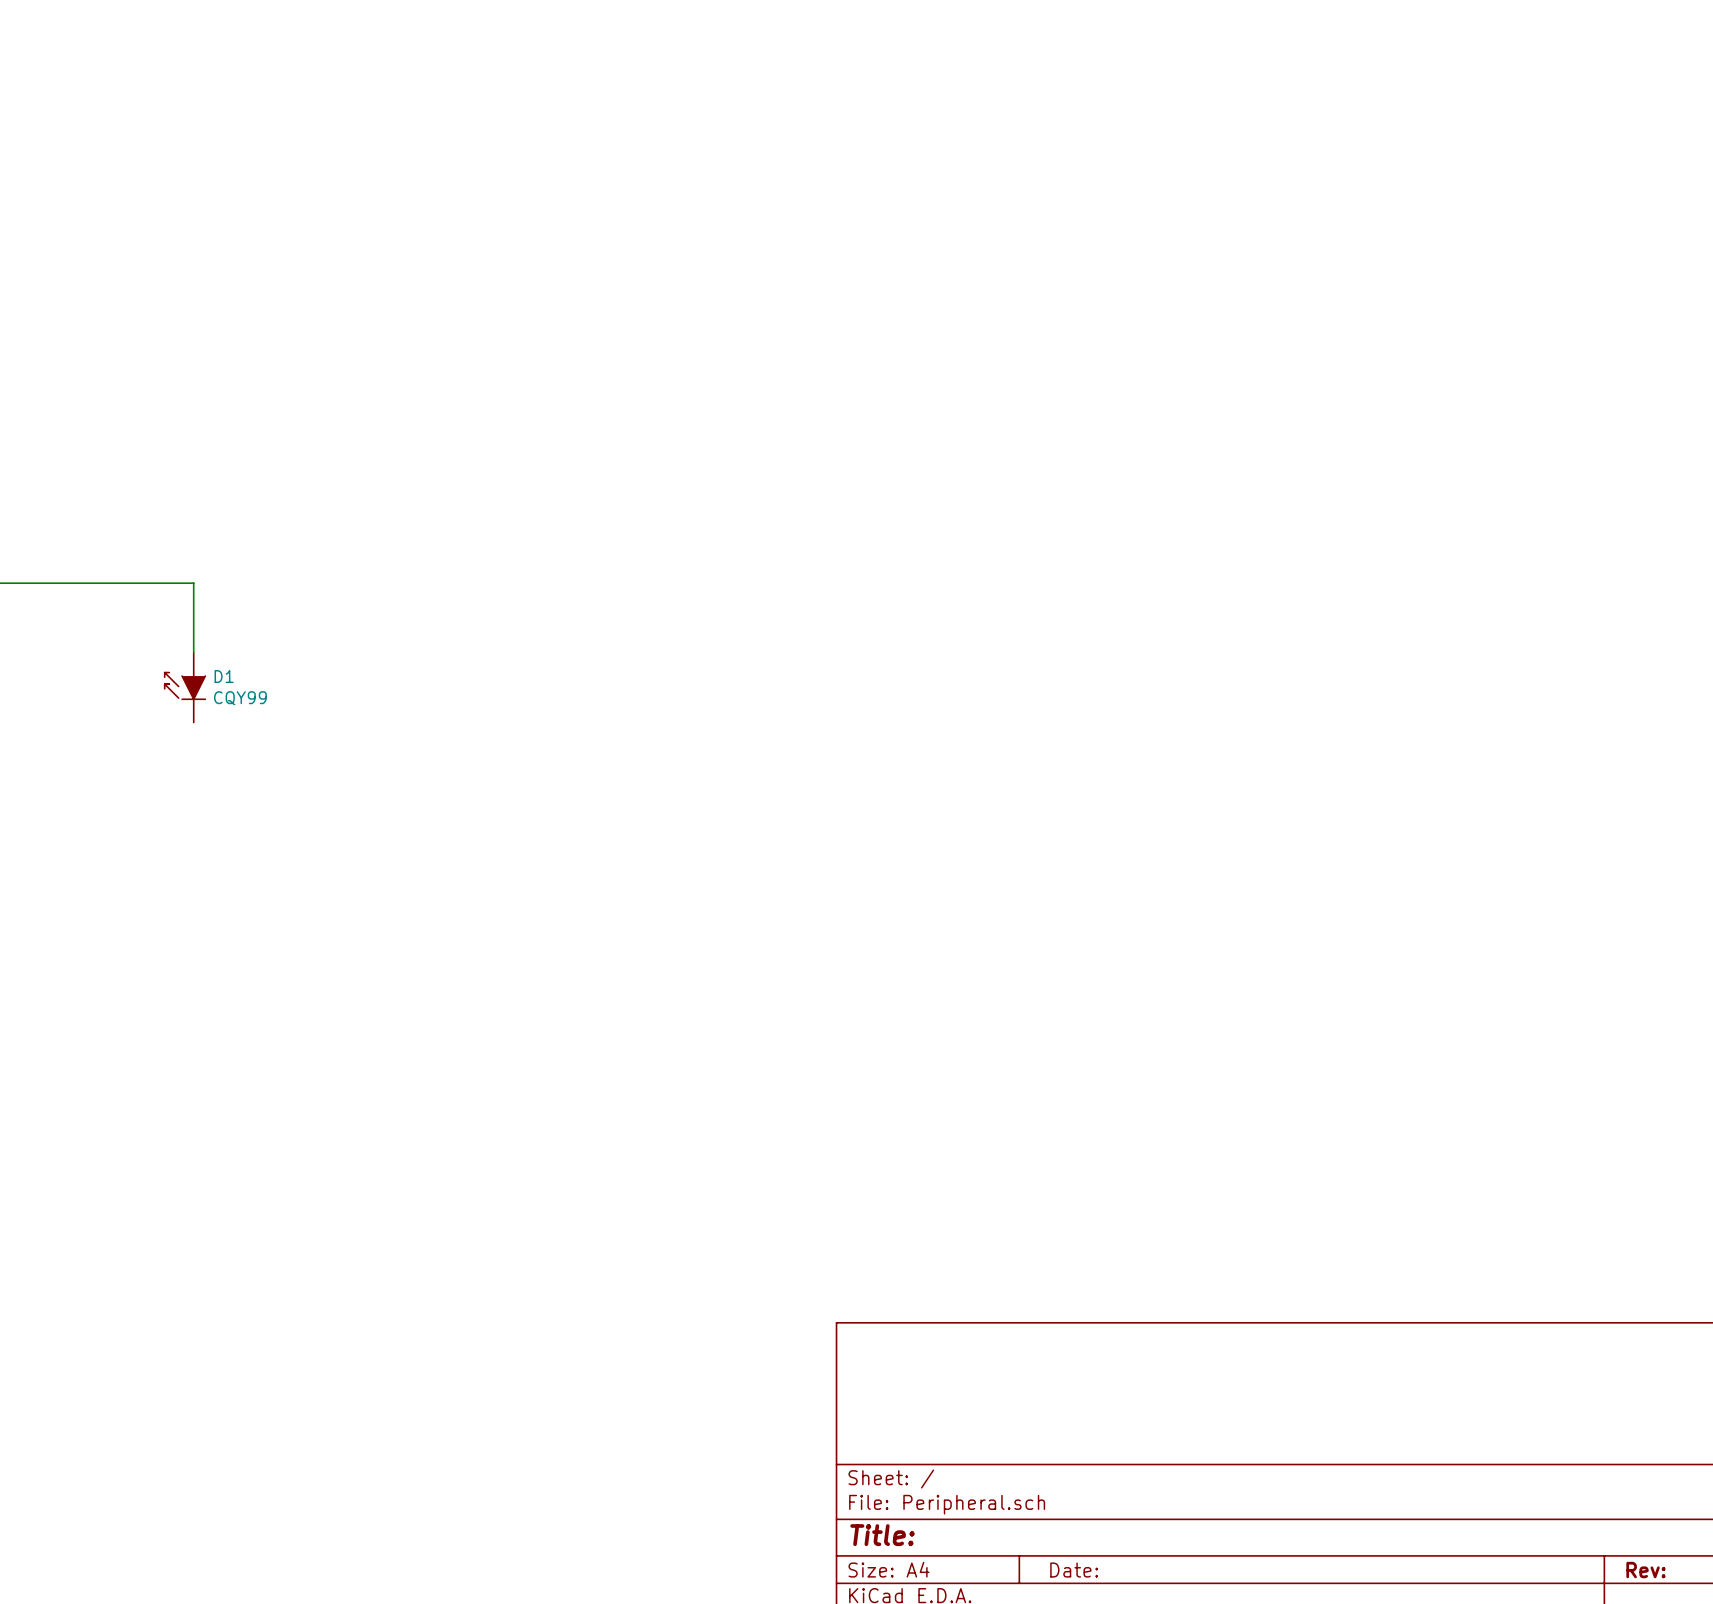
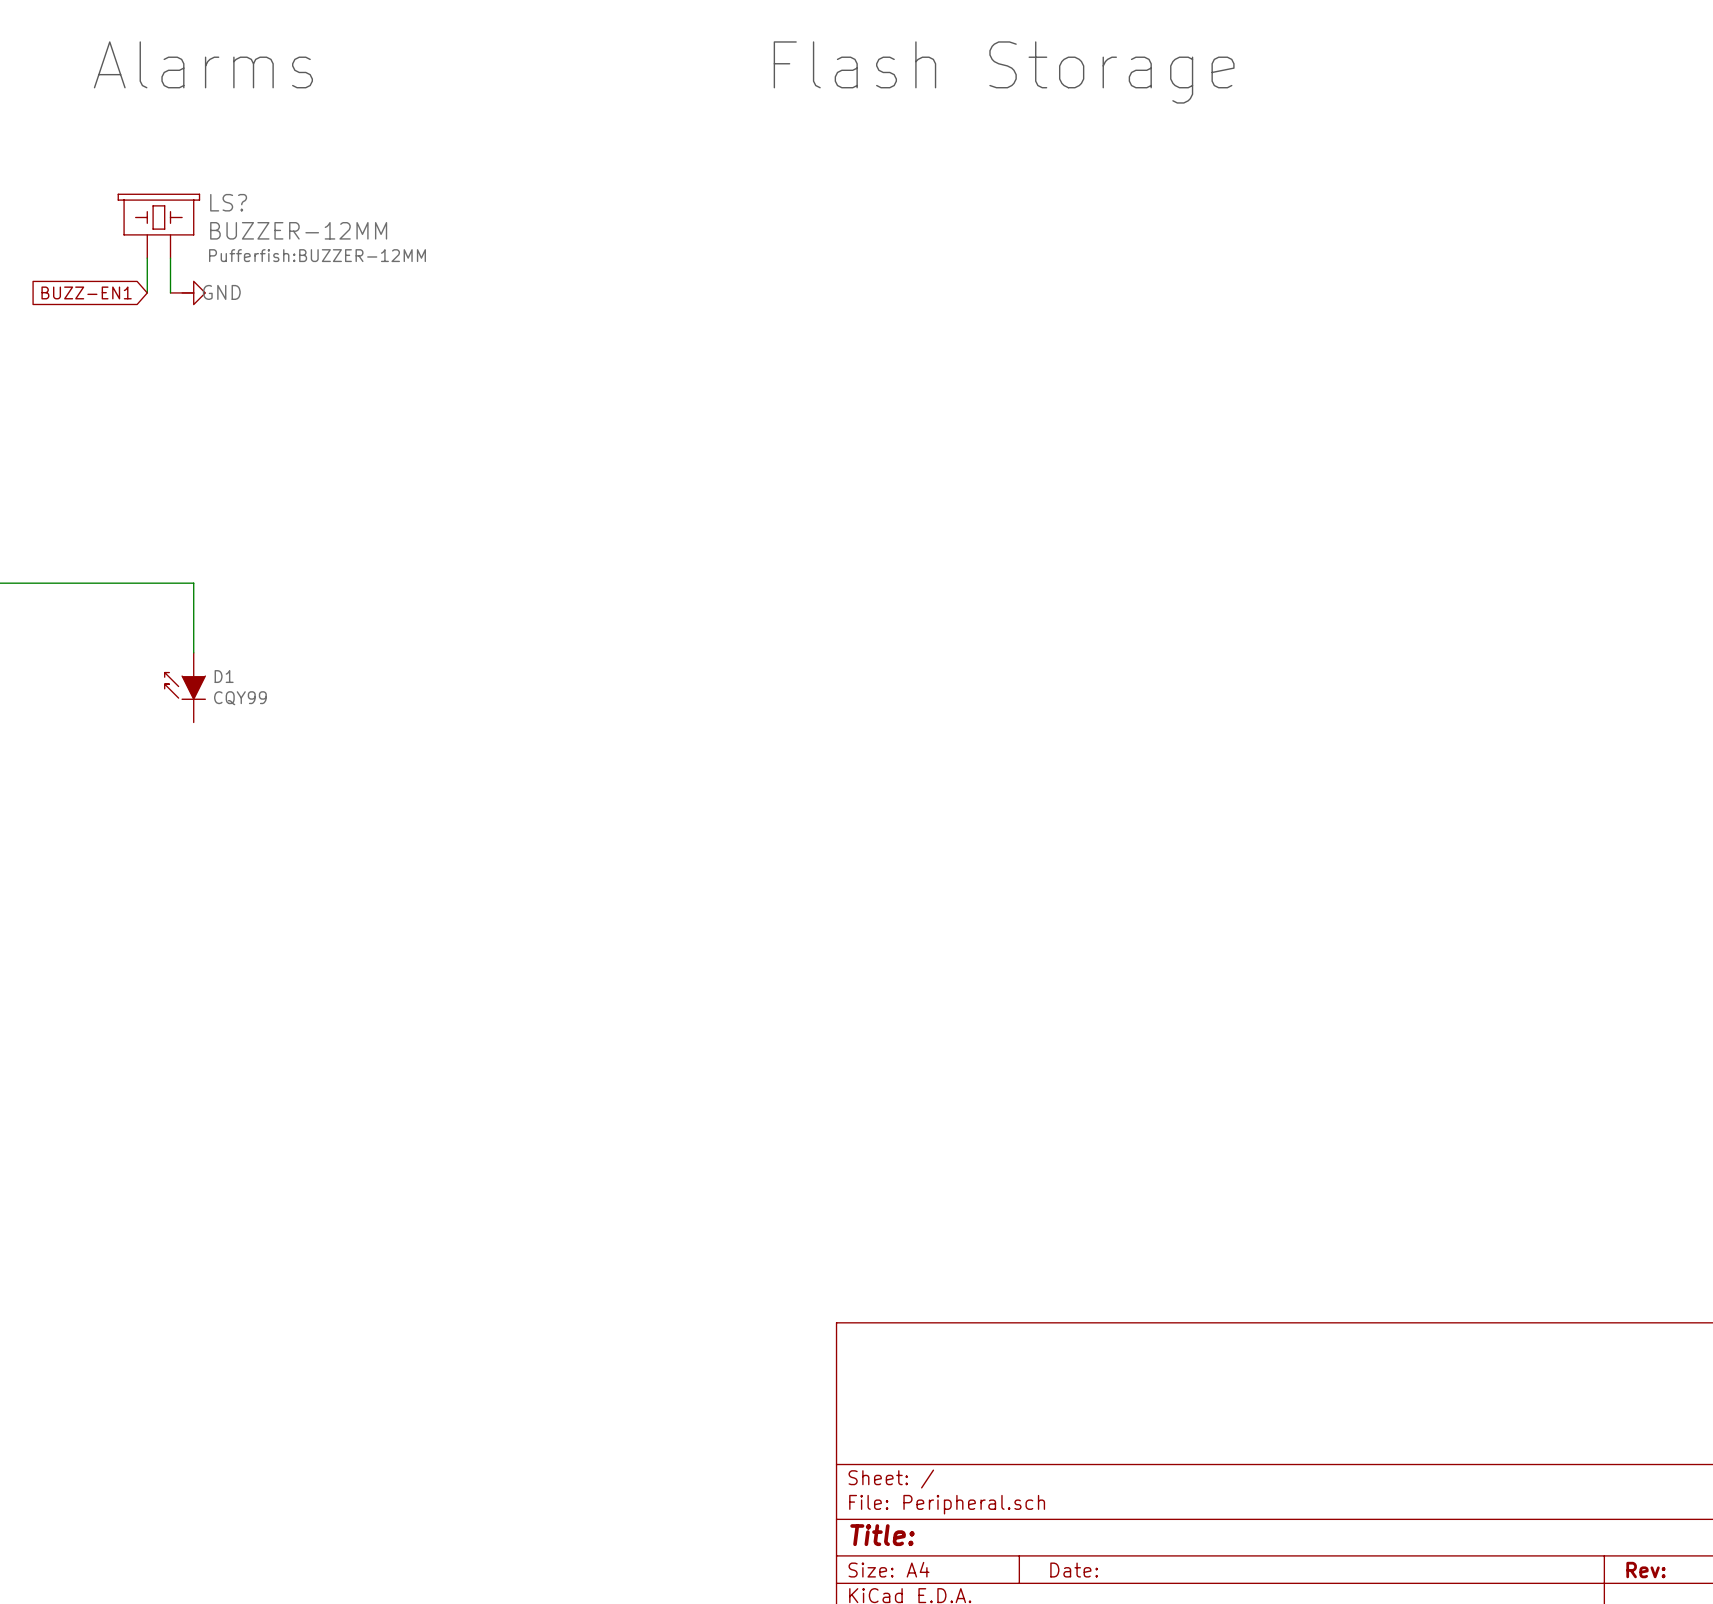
text: none -> Alarms (203, 64)
text: none -> Flash Storage (1004, 72)
LS?: none -> BUZZER-12MM (158, 226)
wire: none -> (147, 258) (147, 292)
wire: none -> (170, 258) (170, 292)
global label: none -> BUZZ-EN1 (86, 292)
power symbol: none -> GND (187, 292)

